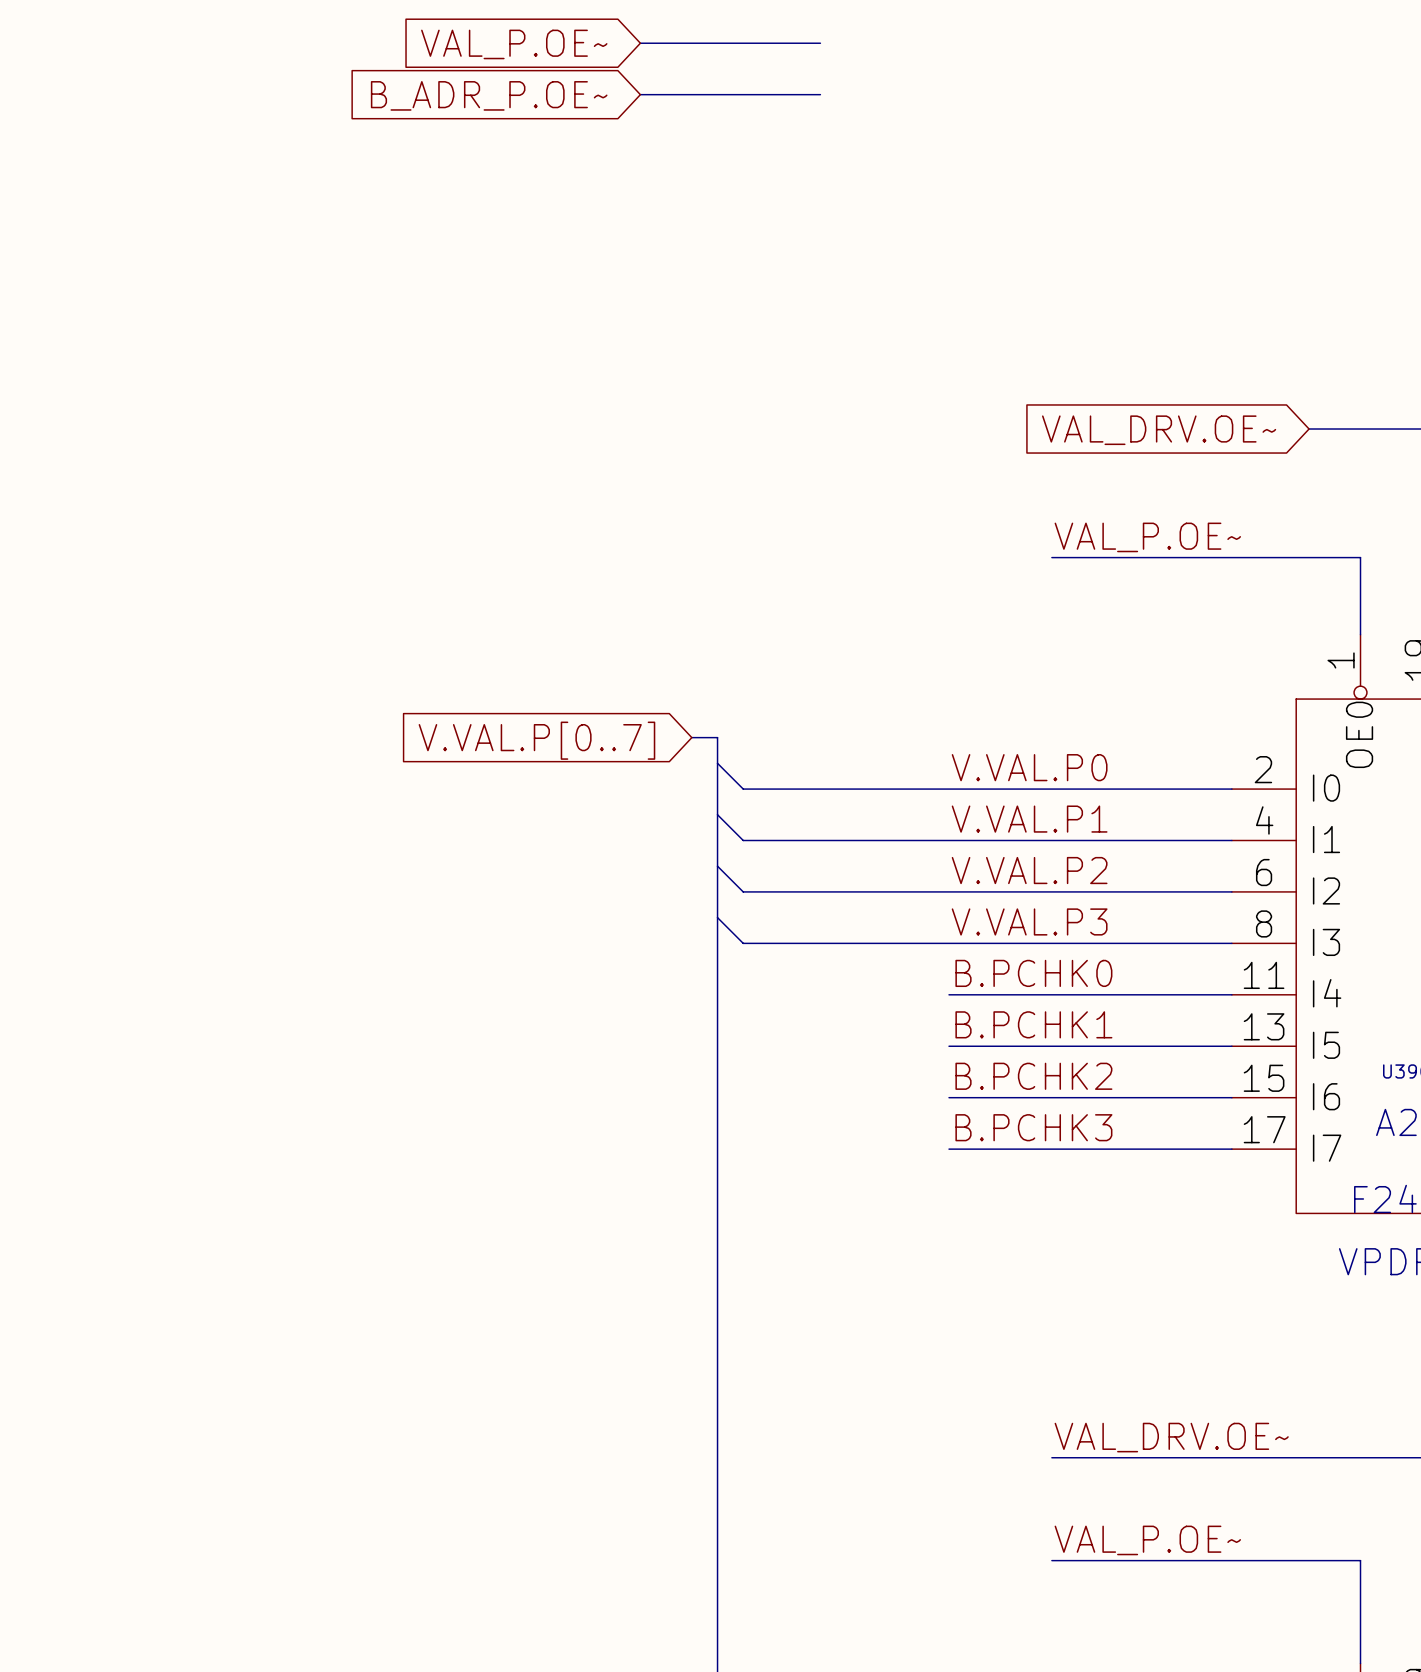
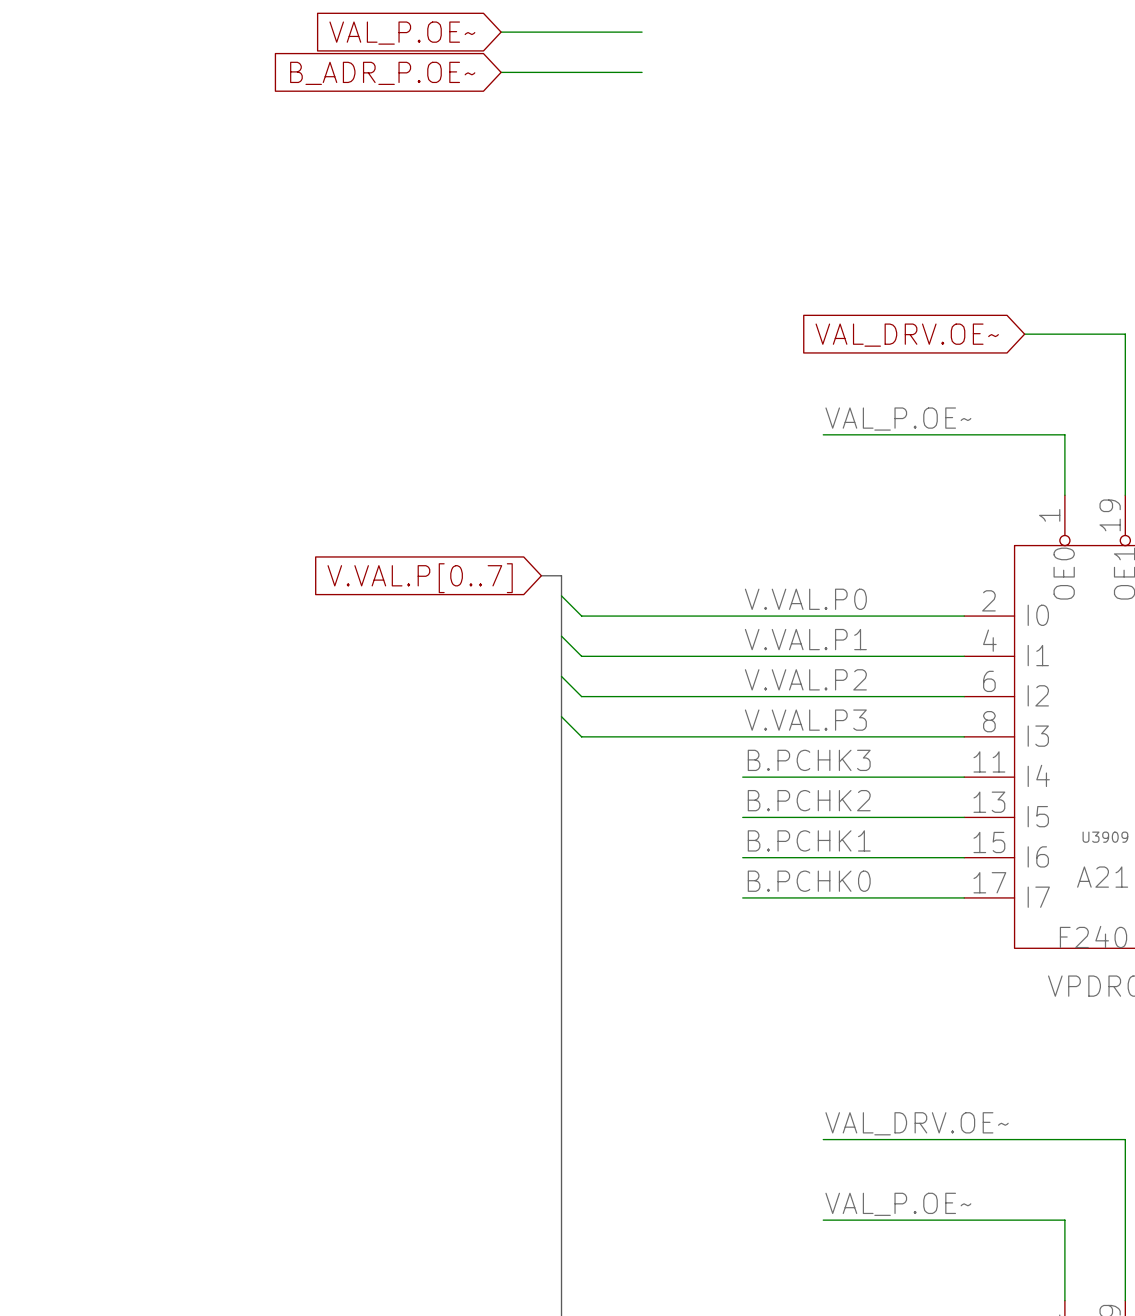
label: B.PCHK0 (1033, 973) -> B.PCHK3 (809, 760)
label: B.PCHK1 (1033, 1024) -> B.PCHK2 (809, 800)
label: B.PCHK2 (1033, 1076) -> B.PCHK1 (809, 840)
label: B.PCHK3 (1033, 1127) -> B.PCHK0 (809, 881)

